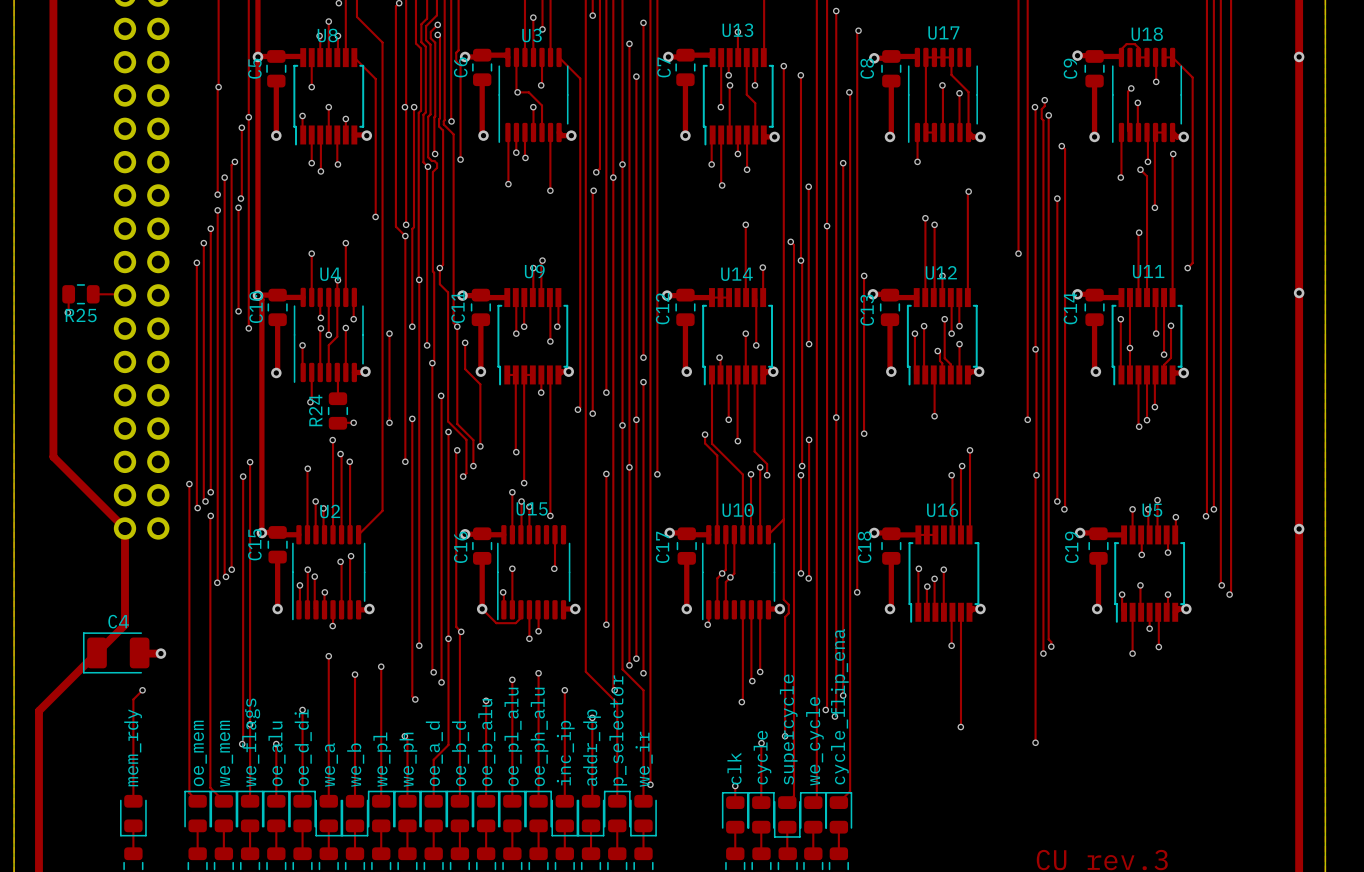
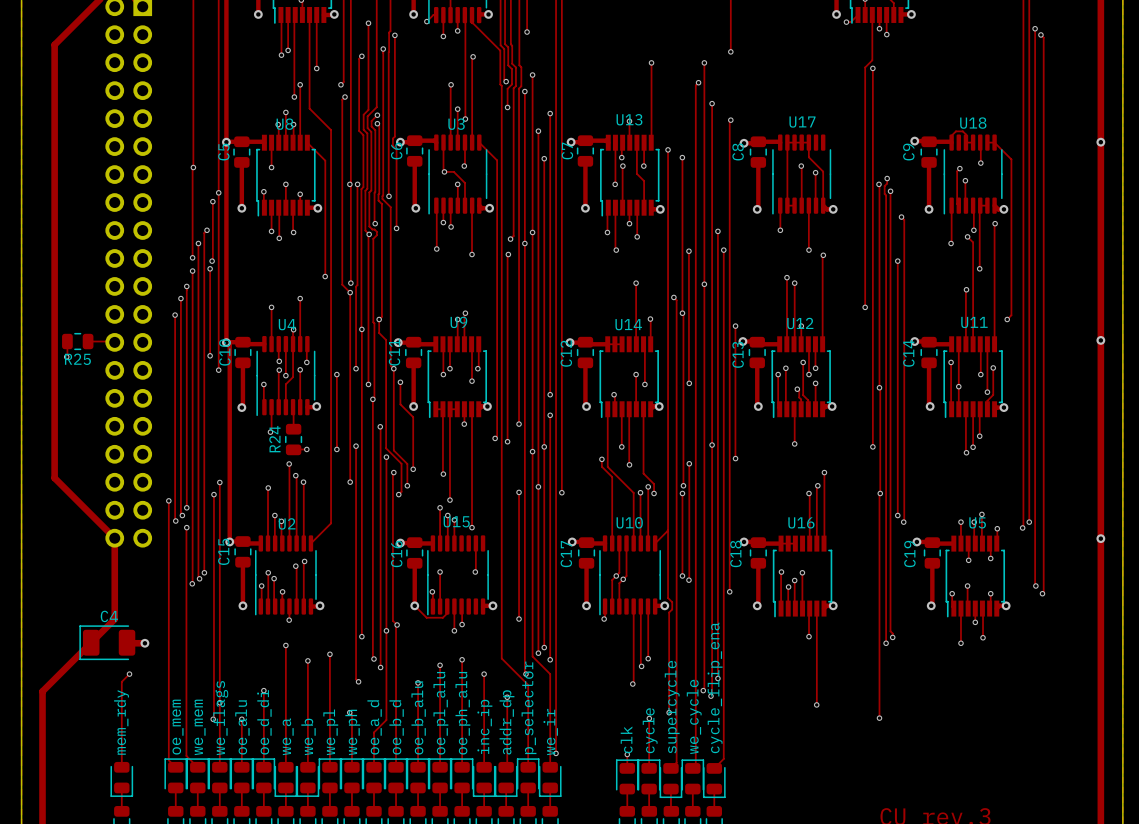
track: (849, 92) (850, 185) -> none
via: (849, 92) -> none
track: none -> (808, 205) (808, 249)
via: none -> (723, 250)
via: none -> (809, 250)
part rotation: 0° (838, 812) -> 180° (714, 780)

